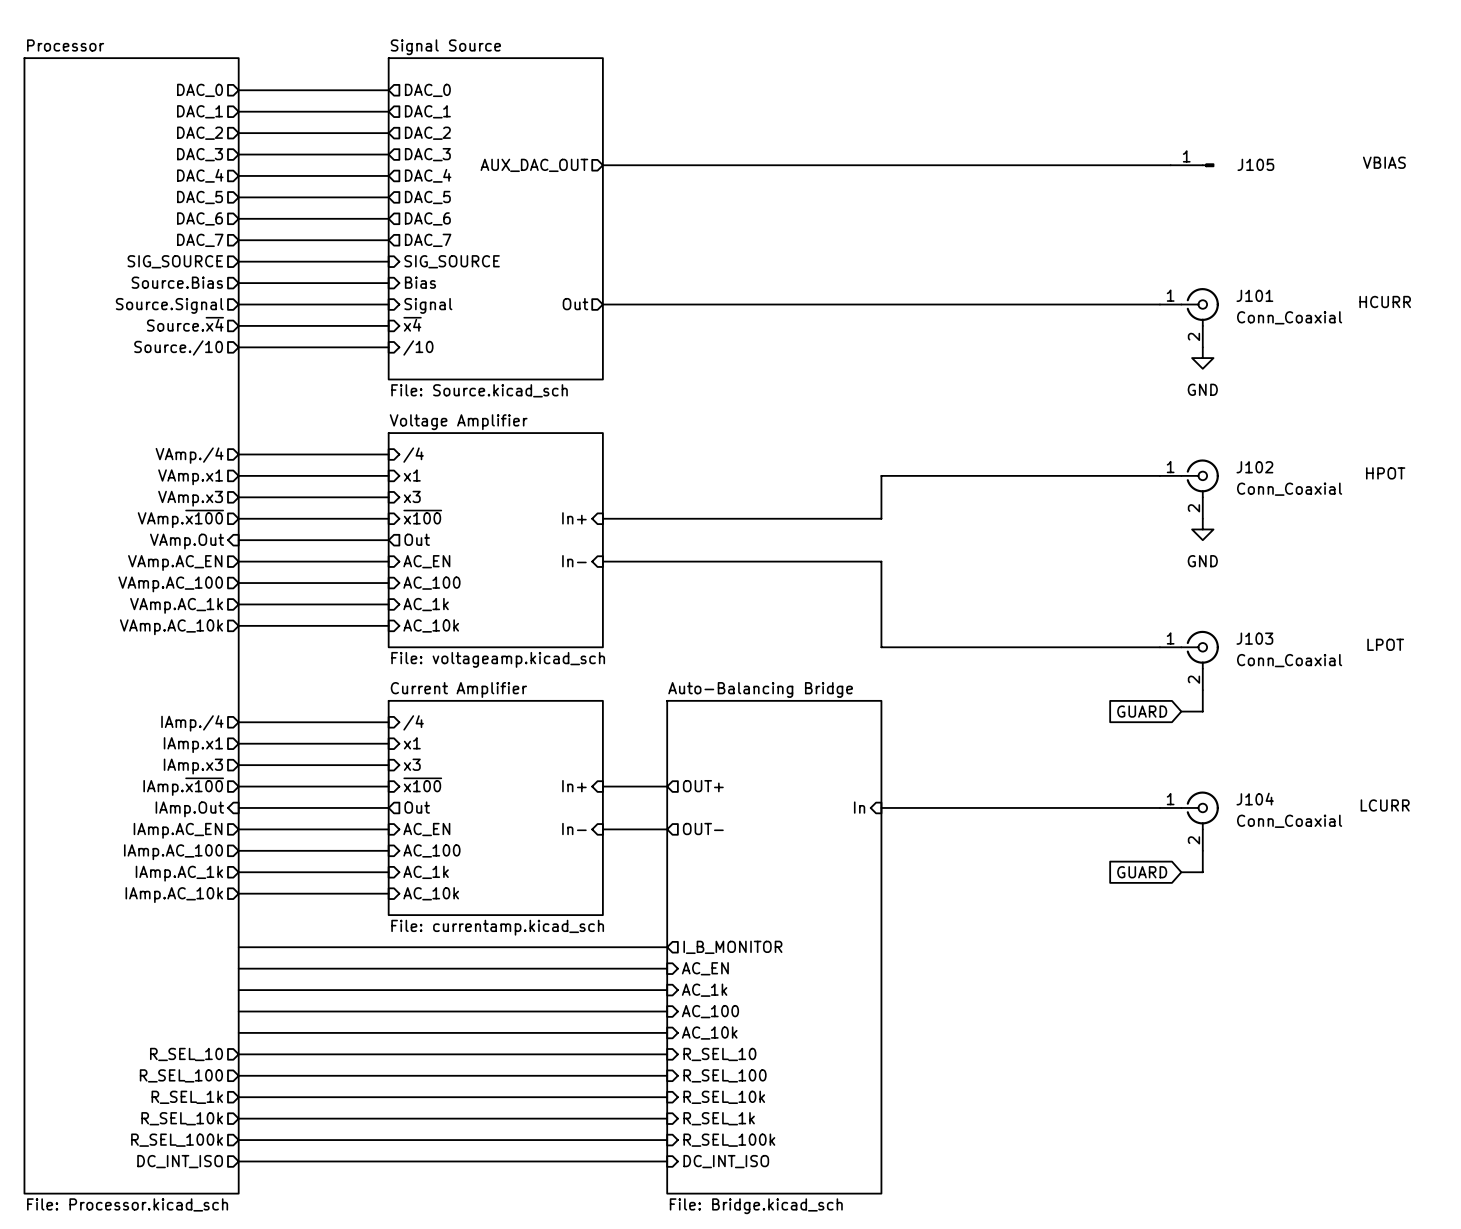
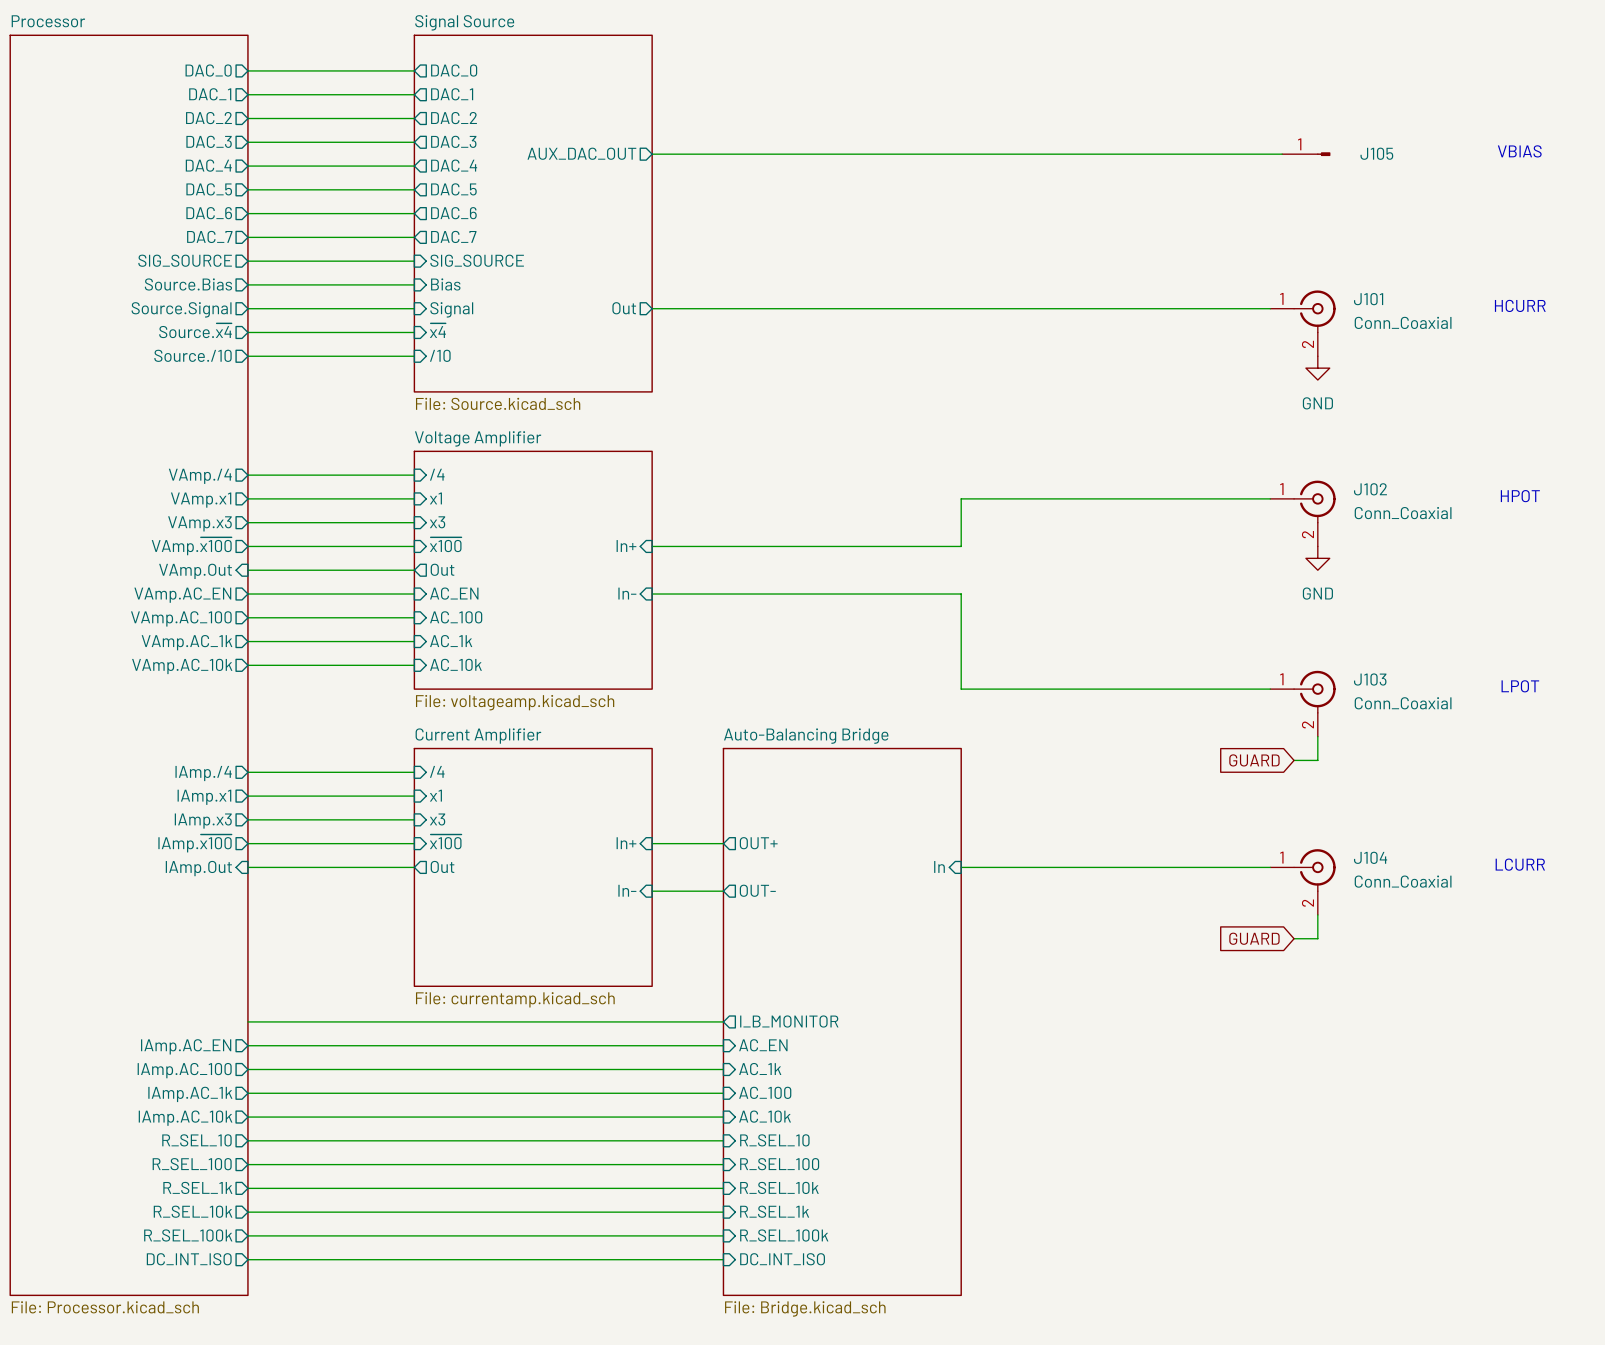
wire: (238, 829) (388, 829) -> none
sheet pin: AC_EN (426, 829) -> none
sheet pin position: IAmp.AC_EN (178, 830) -> IAmp.AC_EN (186, 1046)
wire: (238, 850) (388, 850) -> none
sheet pin: AC_100 (431, 850) -> none
sheet pin position: IAmp.AC_100 (173, 852) -> IAmp.AC_100 (184, 1070)
wire: (238, 872) (388, 872) -> none
sheet pin: AC_1k (426, 872) -> none
sheet pin position: IAmp.AC_1k (179, 873) -> IAmp.AC_1k (190, 1094)
wire: (238, 893) (388, 893) -> none
sheet pin: AC_10k (431, 893) -> none
sheet pin position: IAmp.AC_10k (174, 895) -> IAmp.AC_10k (185, 1118)

